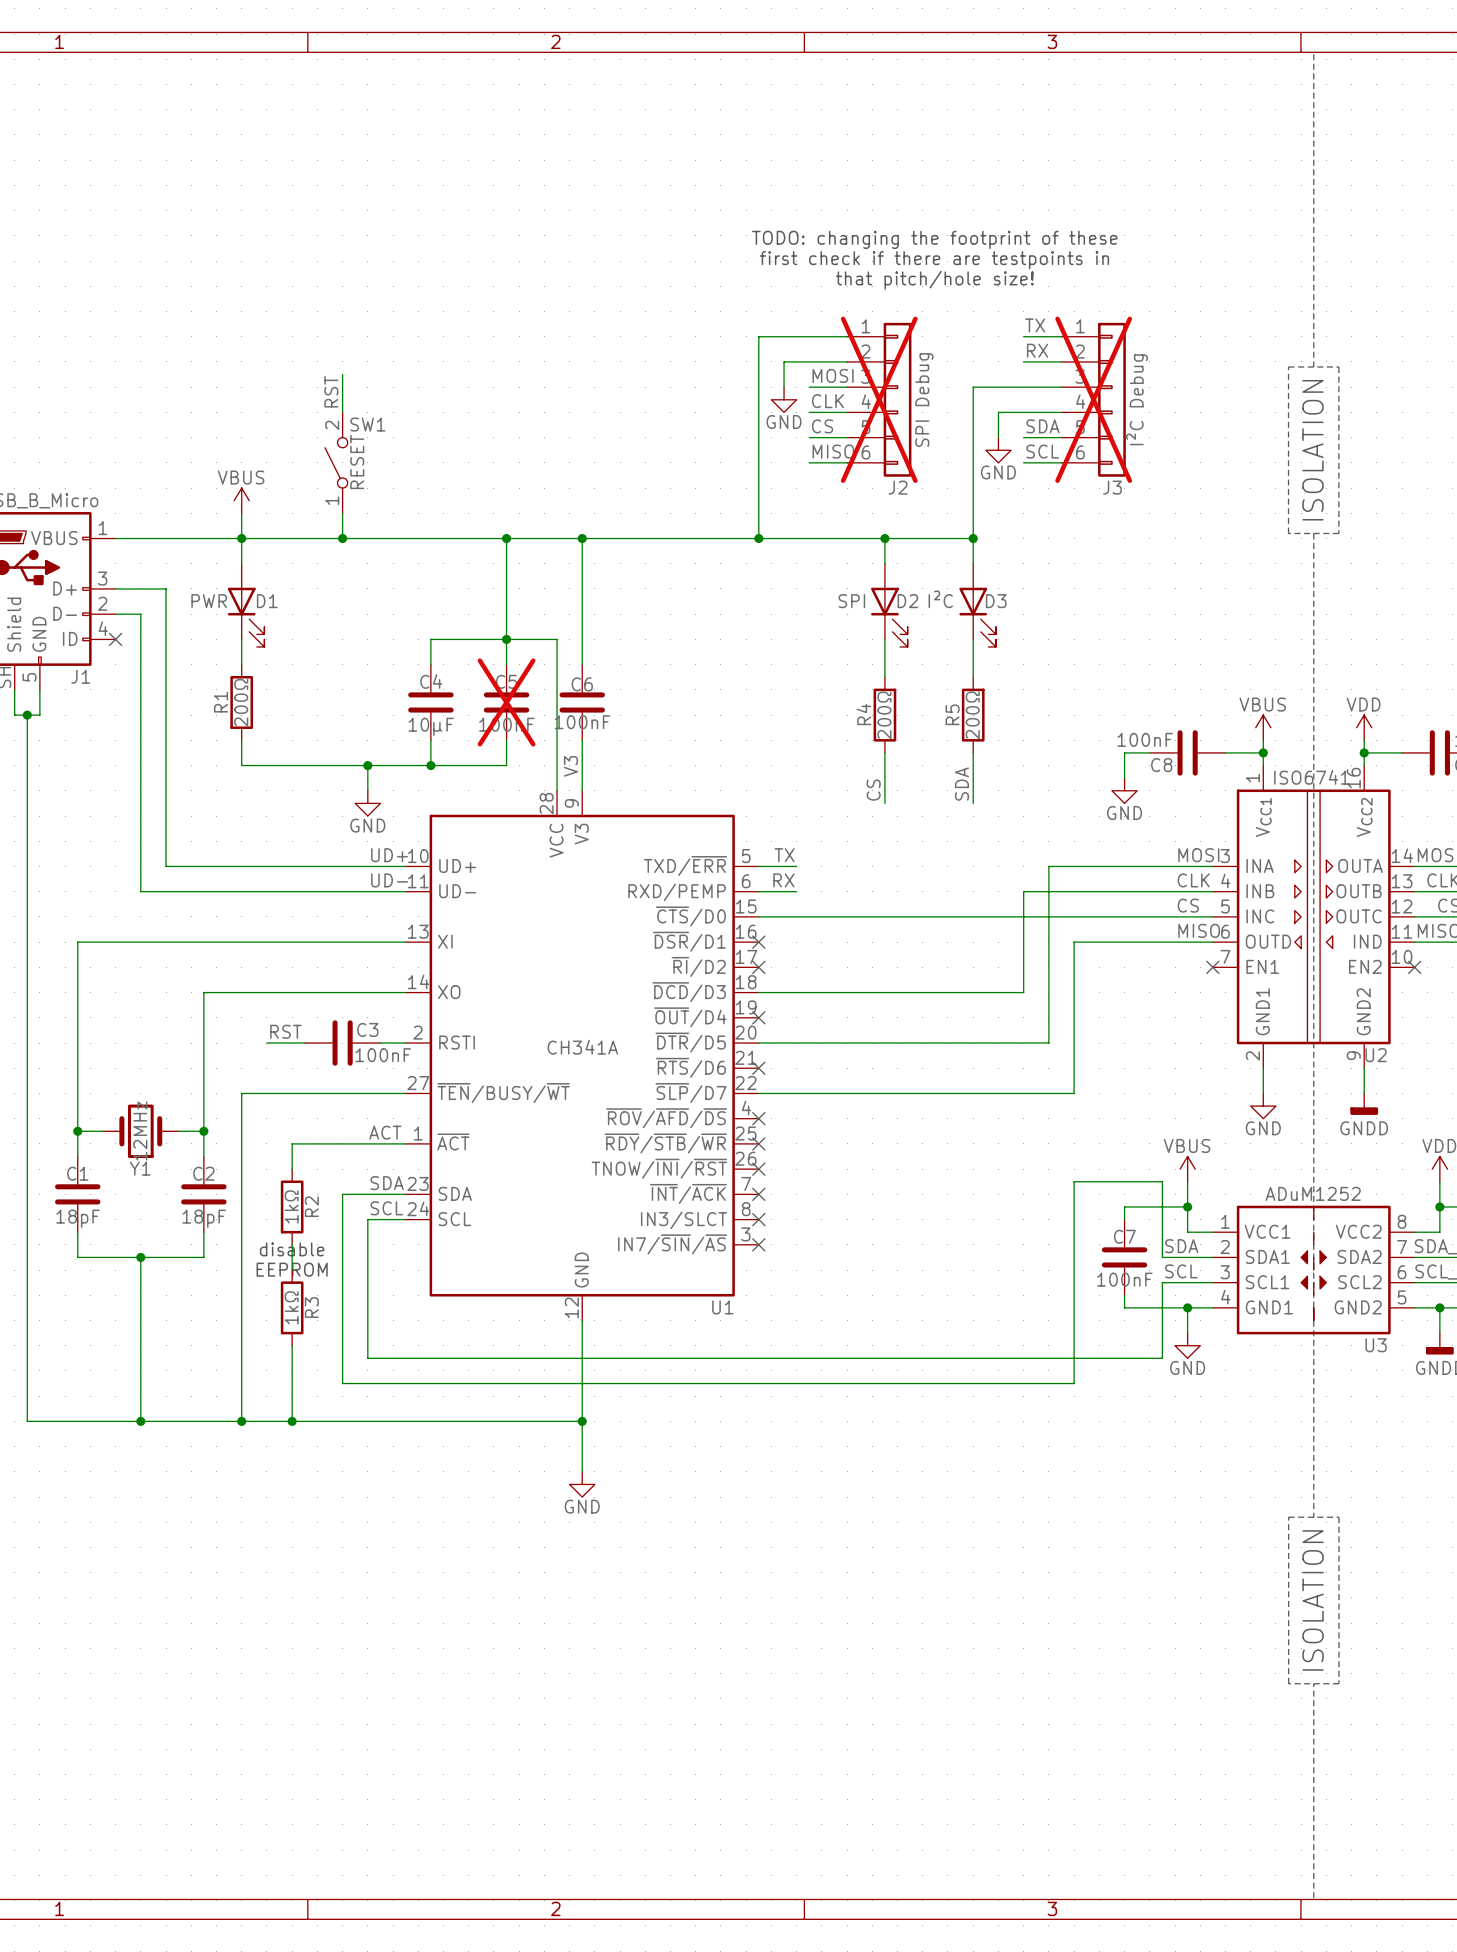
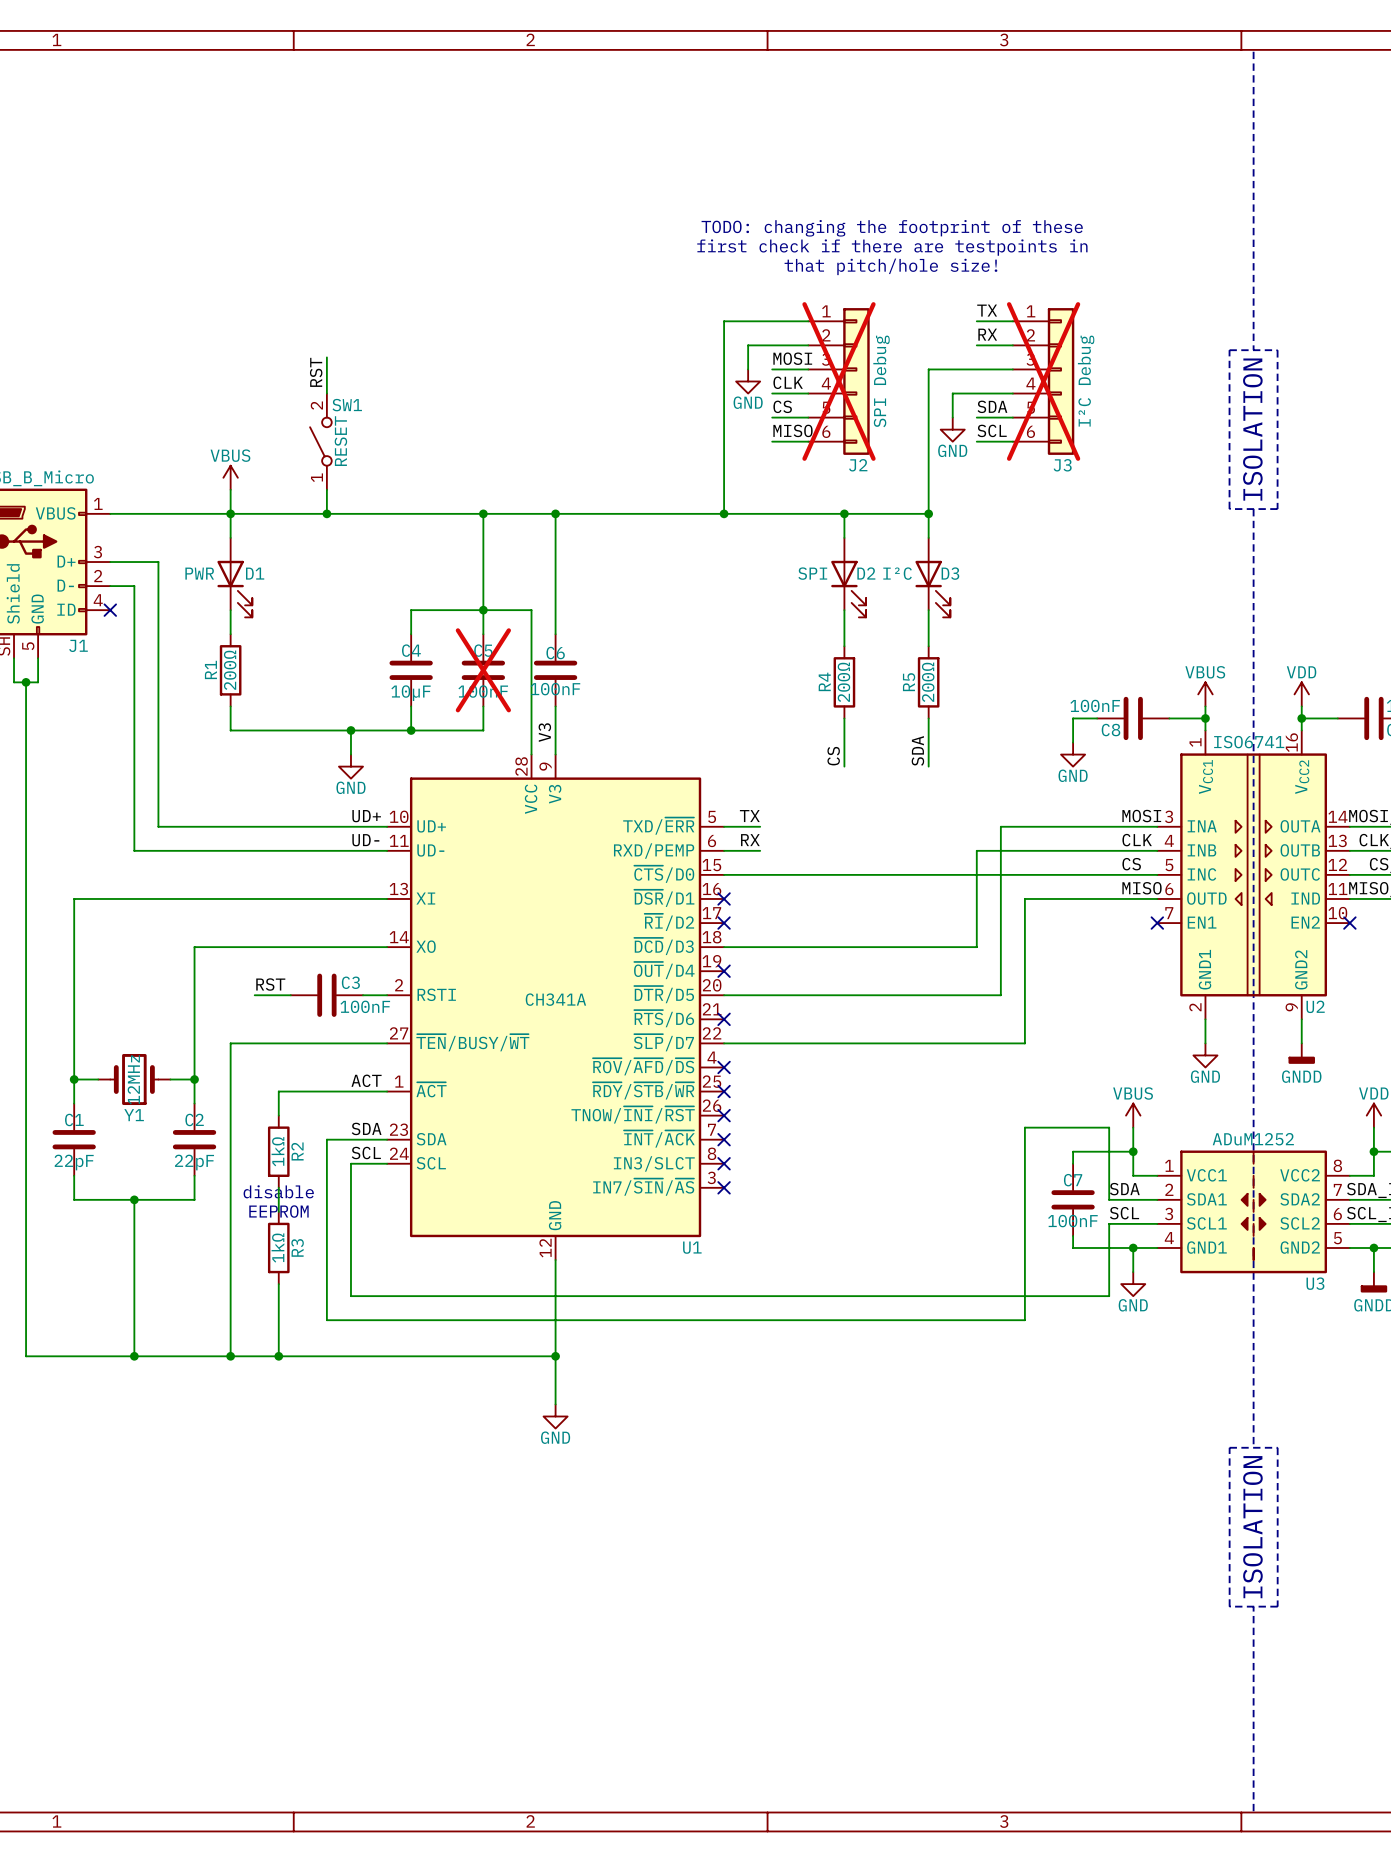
C1 value: 18pF (78, 1218) -> 22pF (74, 1162)
C2 value: 18pF (204, 1218) -> 22pF (194, 1162)

